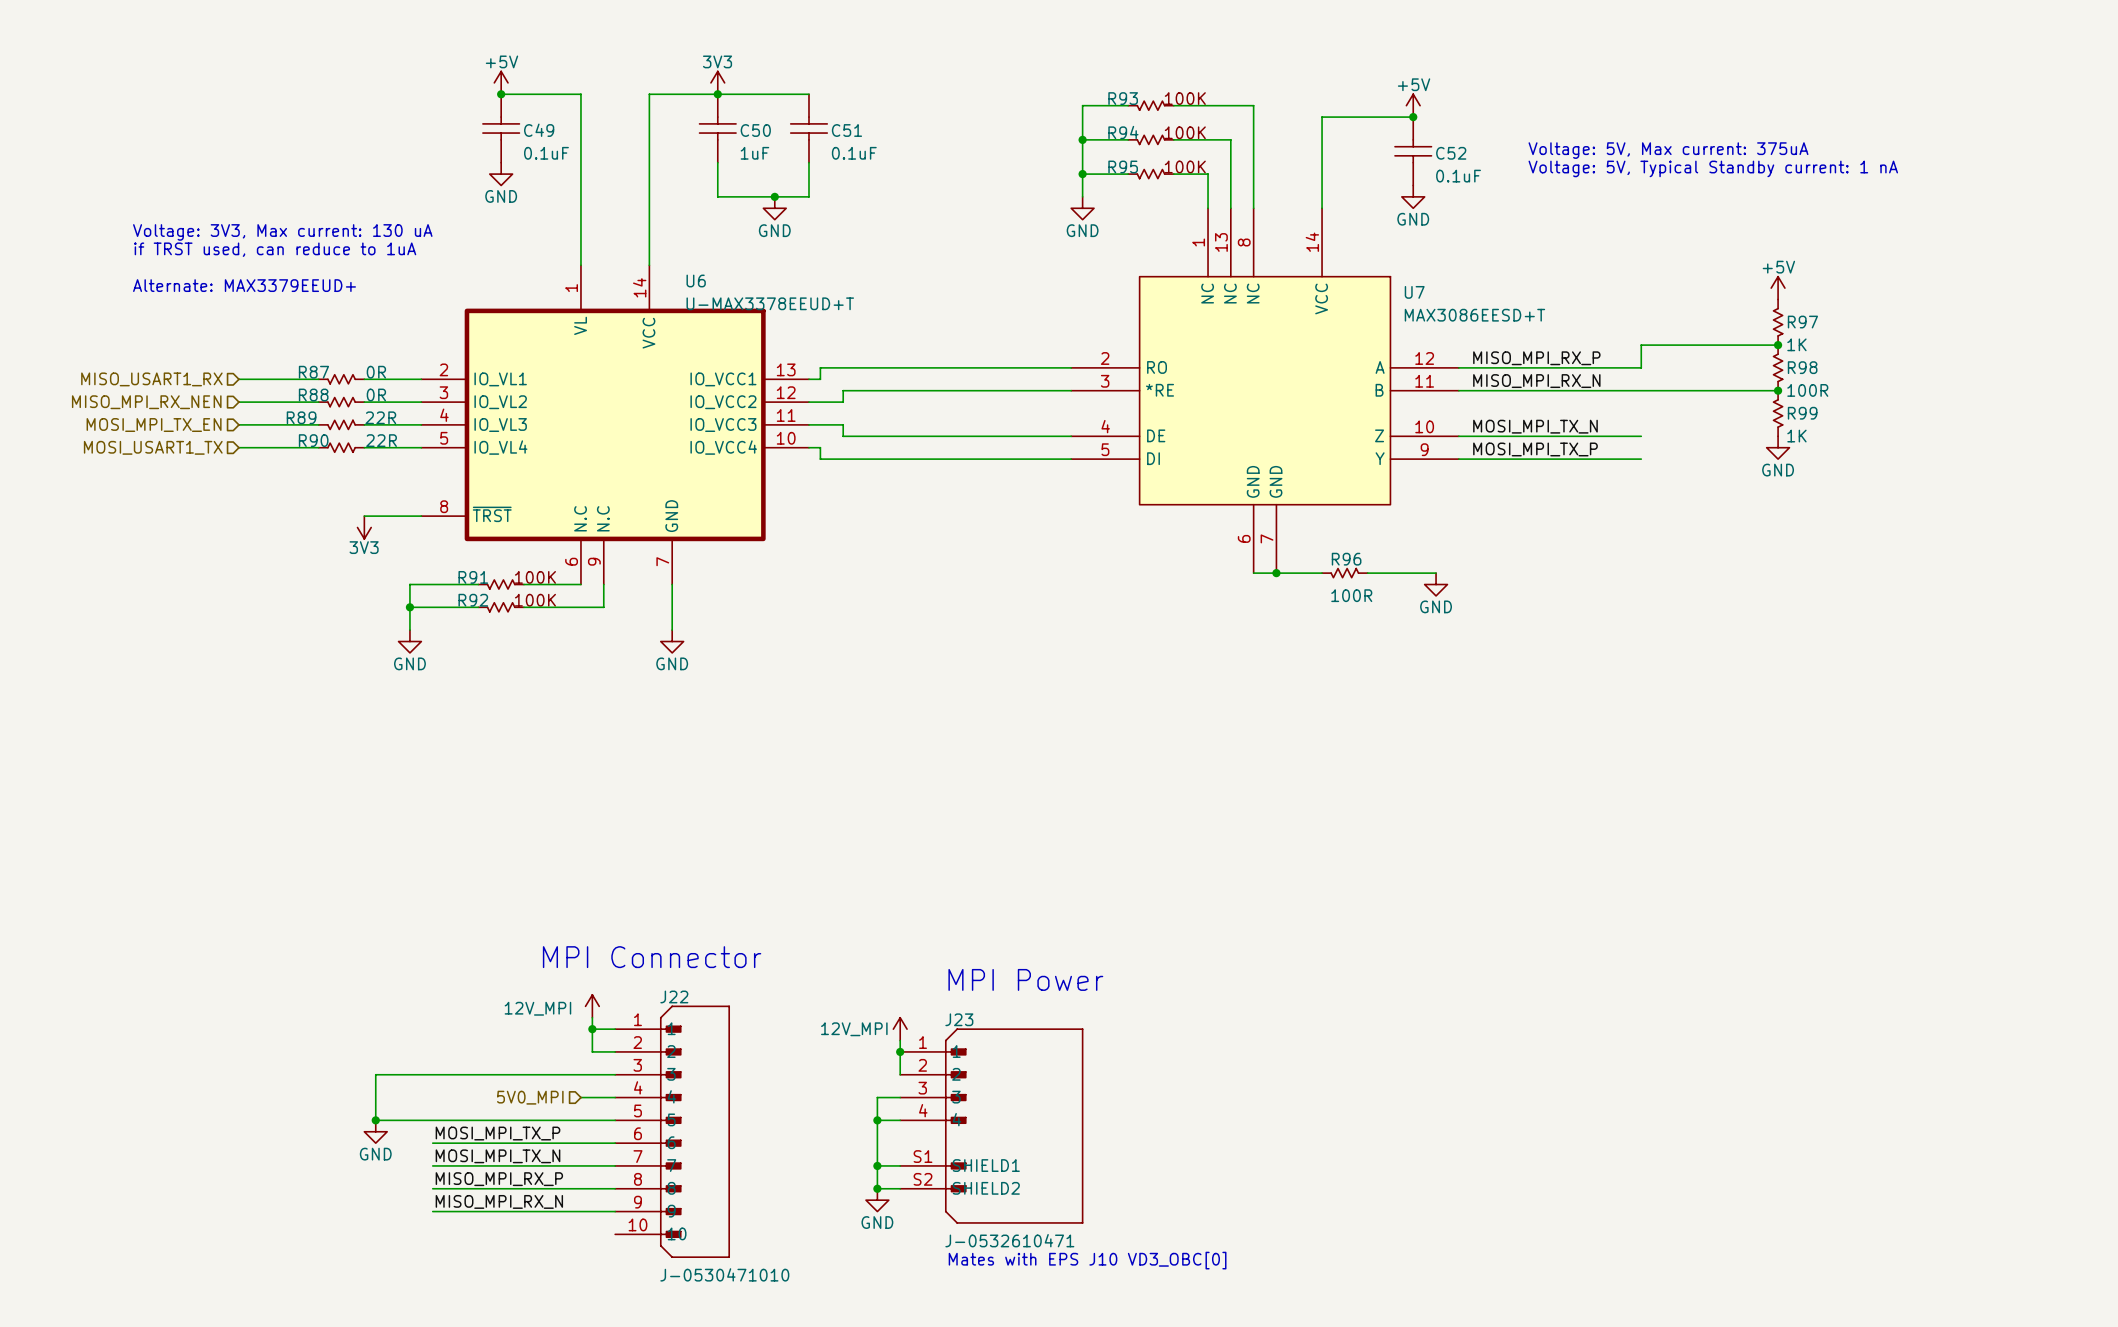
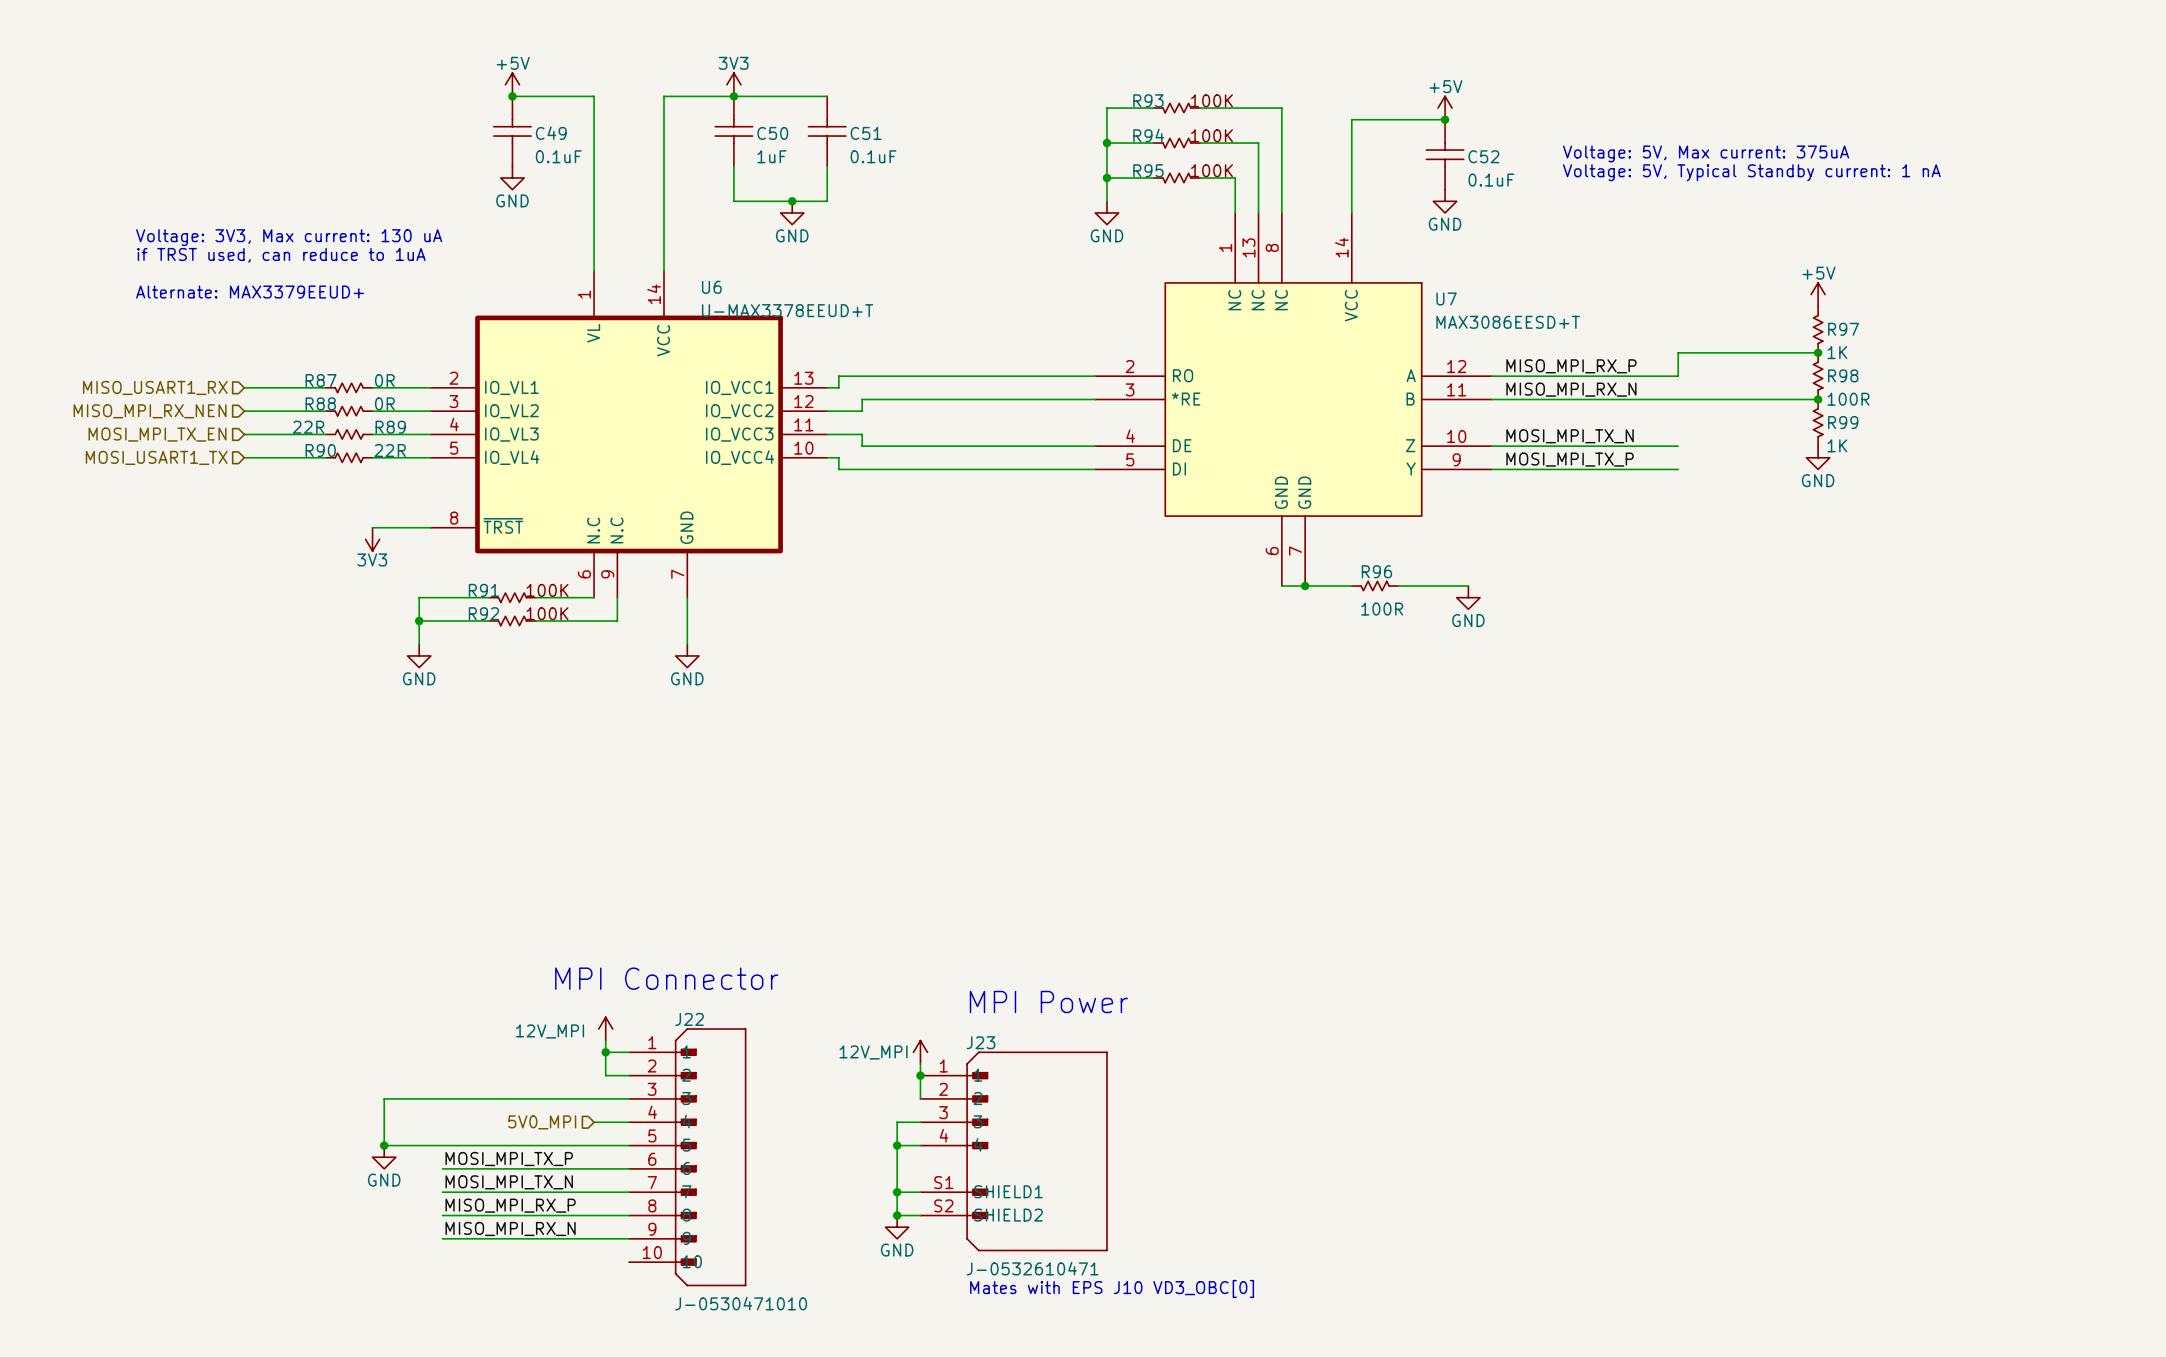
R89 flip: as is (341, 424) -> left-right (349, 434)

